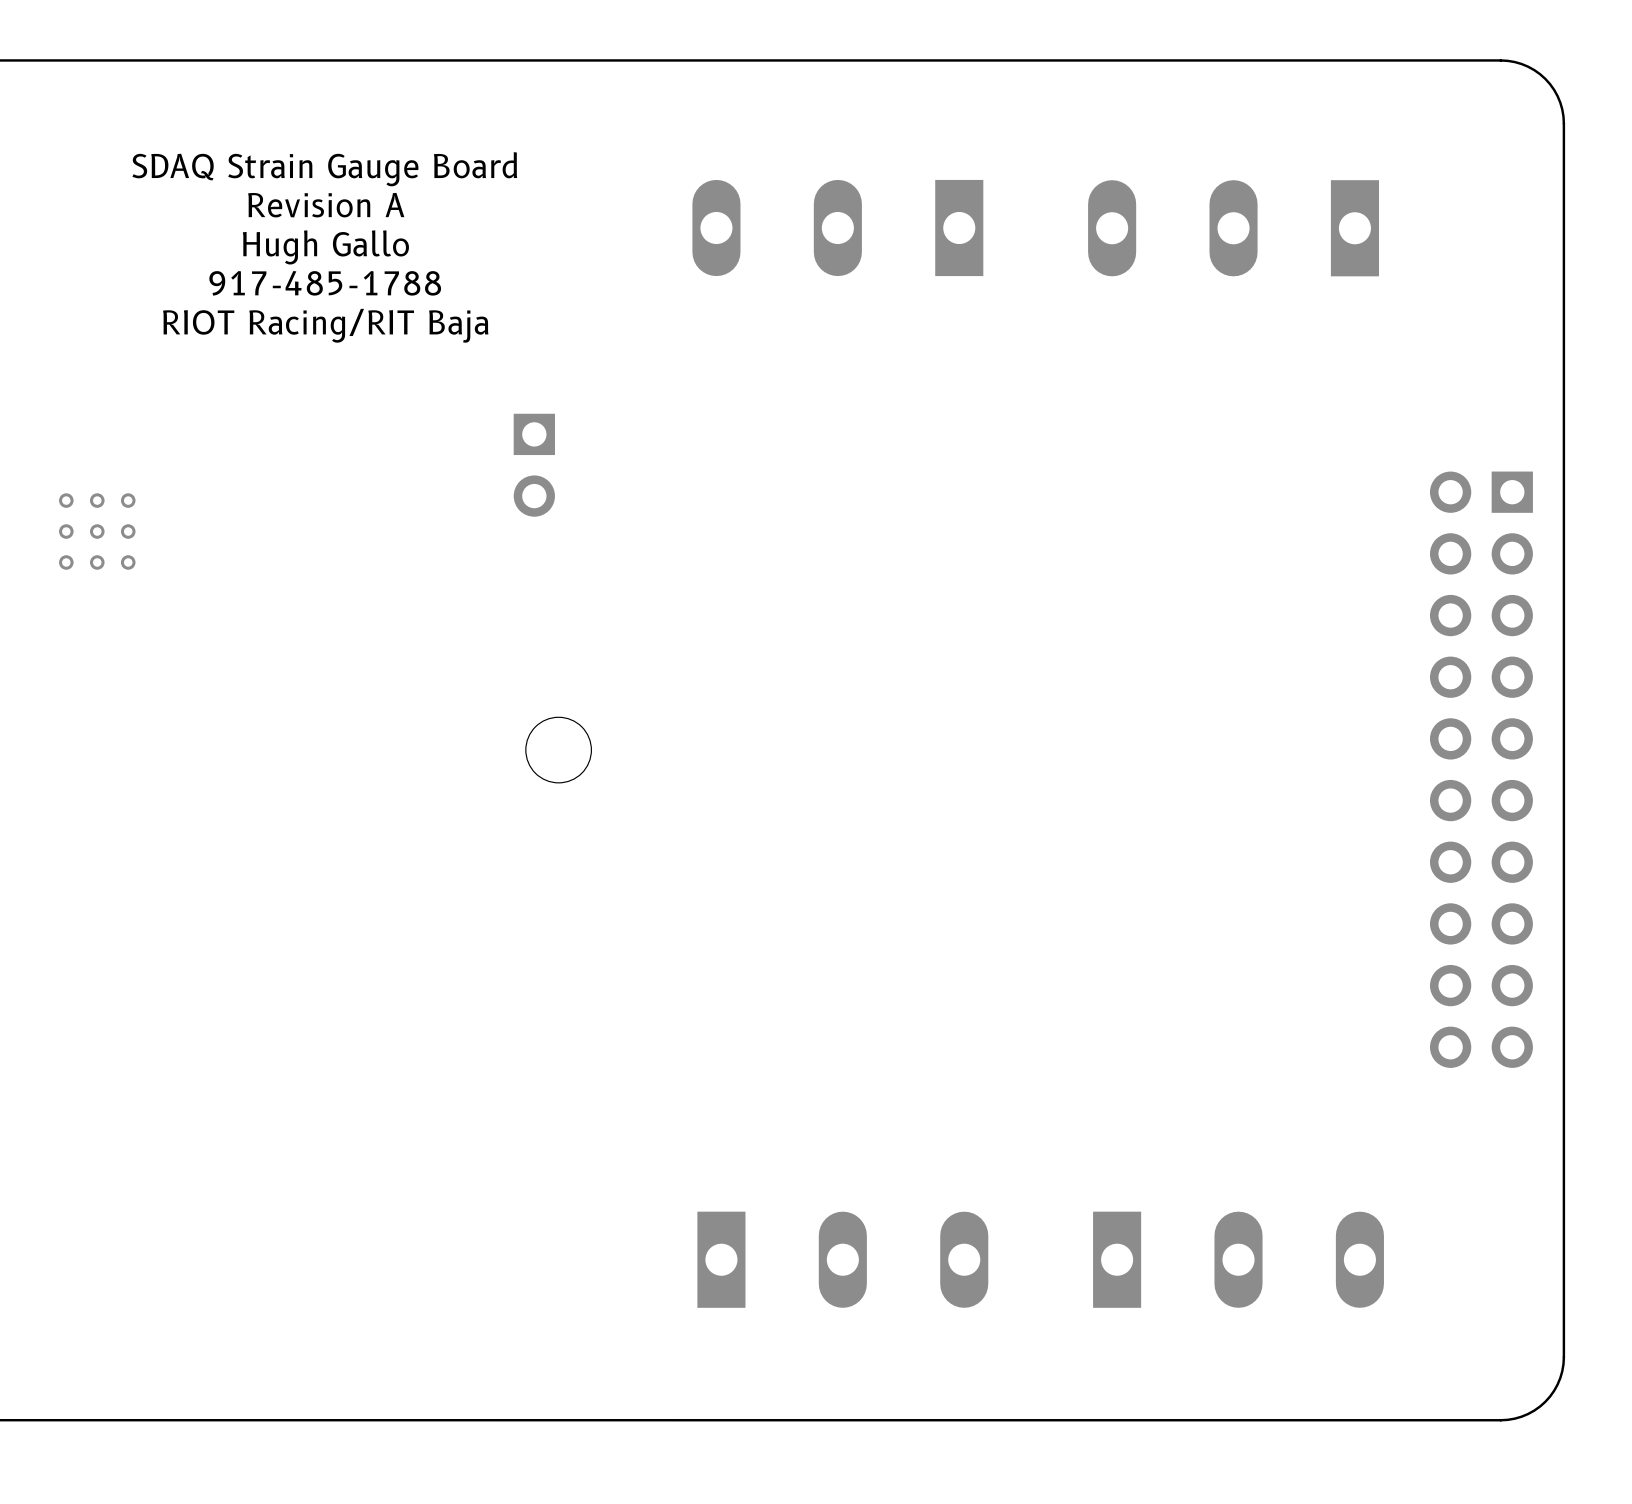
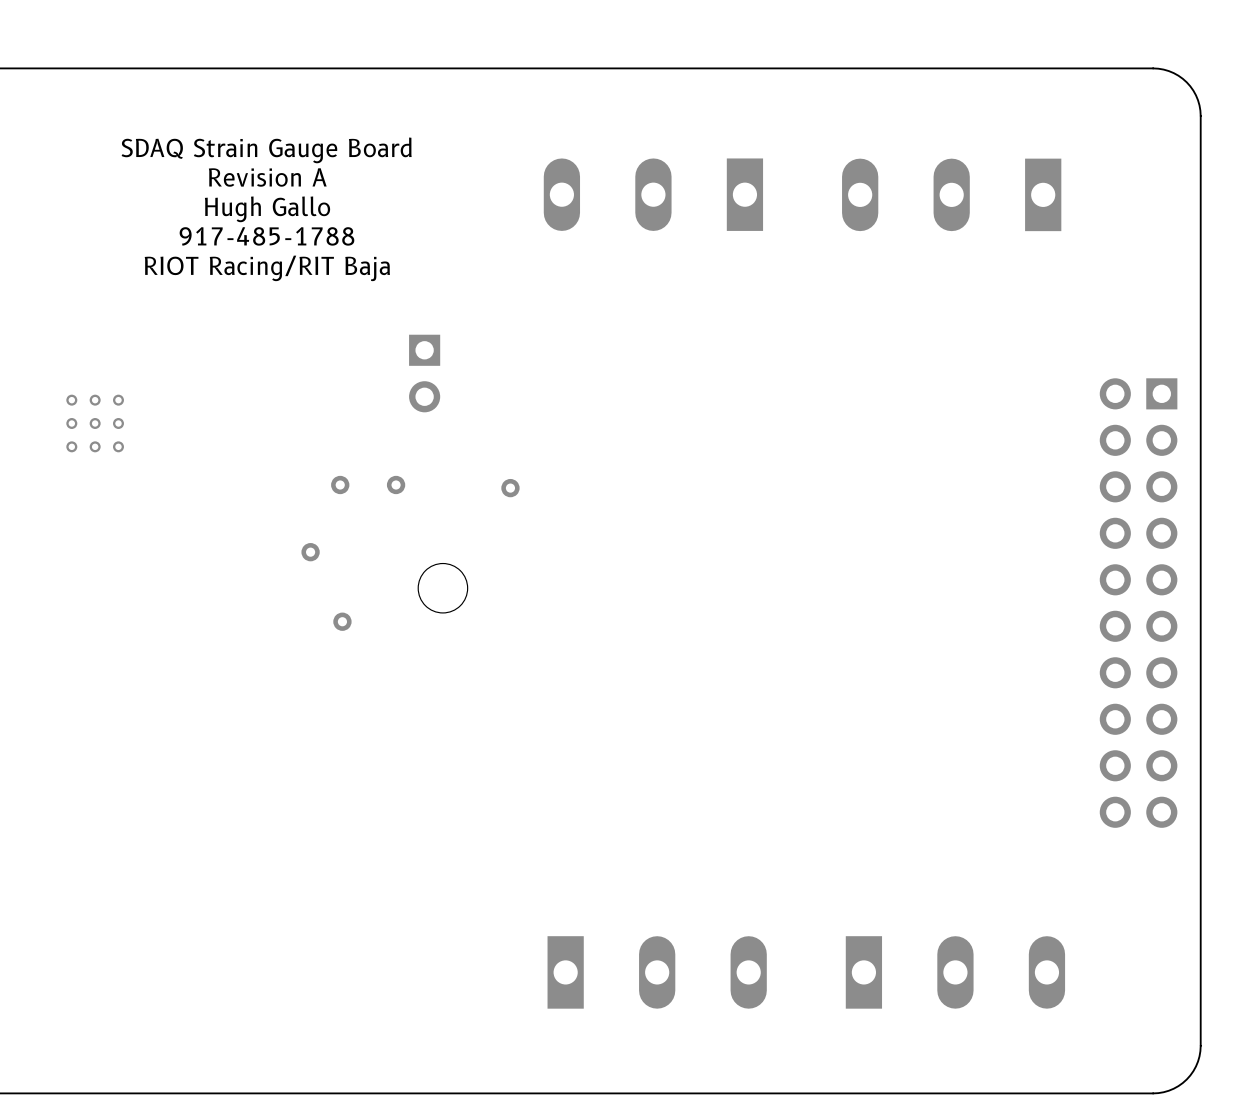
part: none -> (340, 484)
part: none -> (396, 484)
part: none -> (510, 488)
part: none -> (310, 552)
part: none -> (342, 621)

